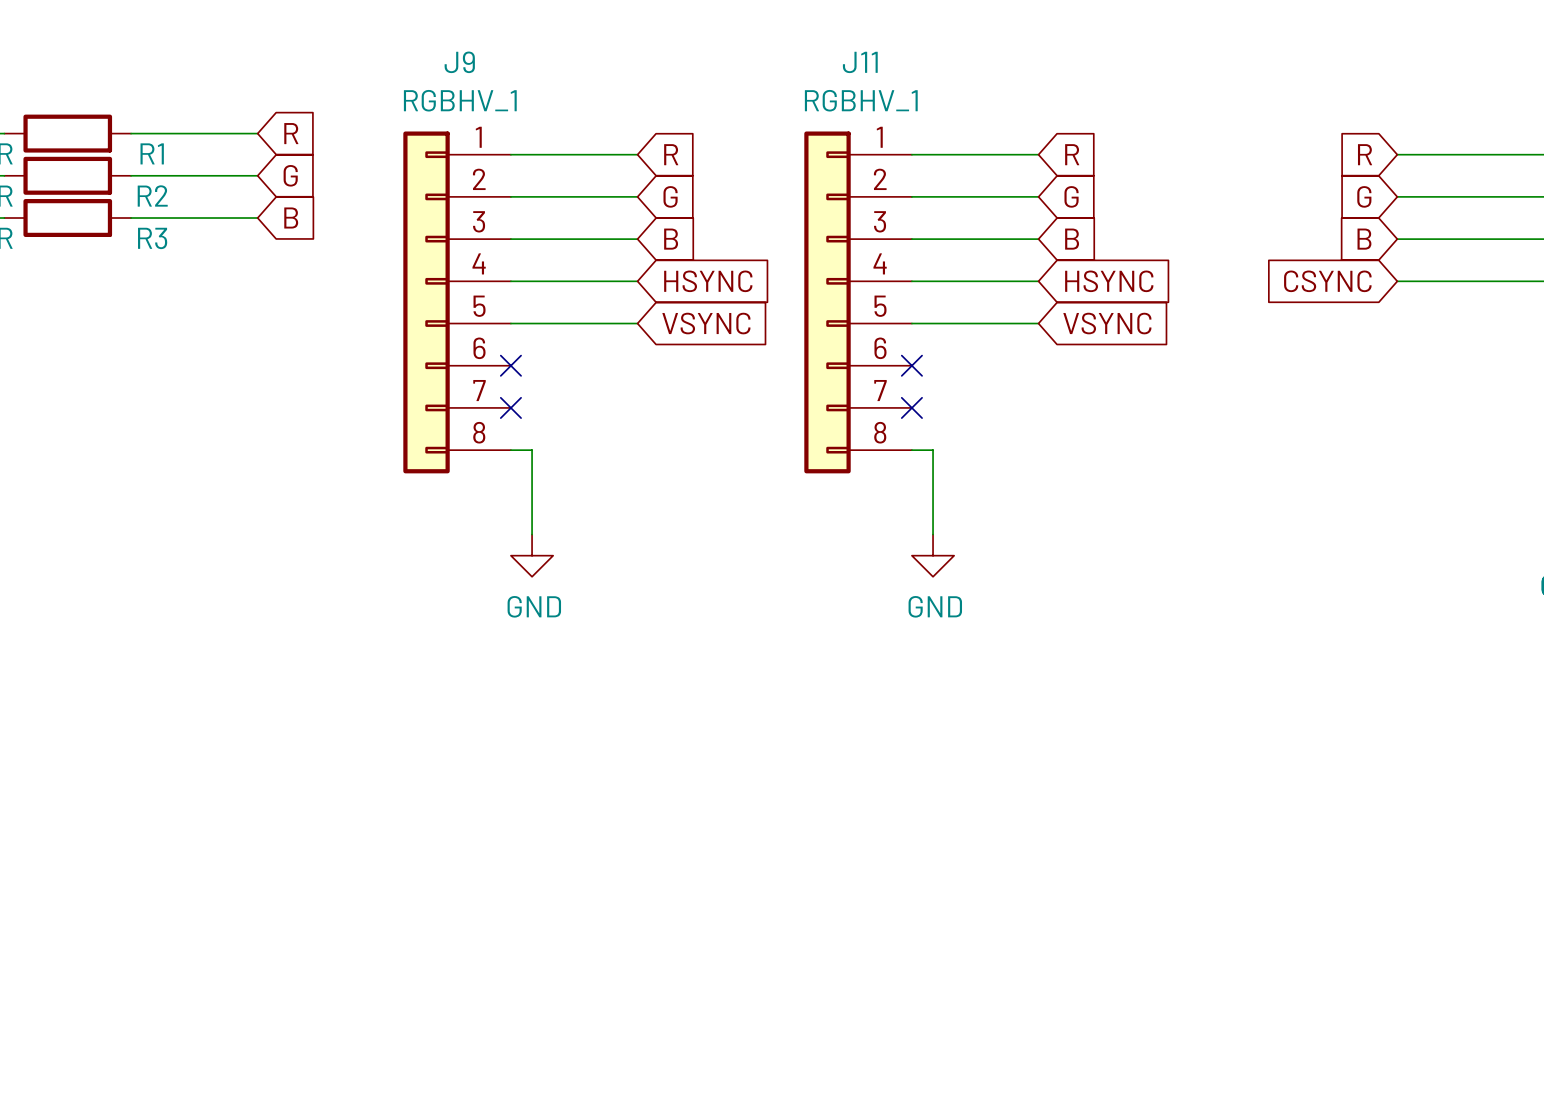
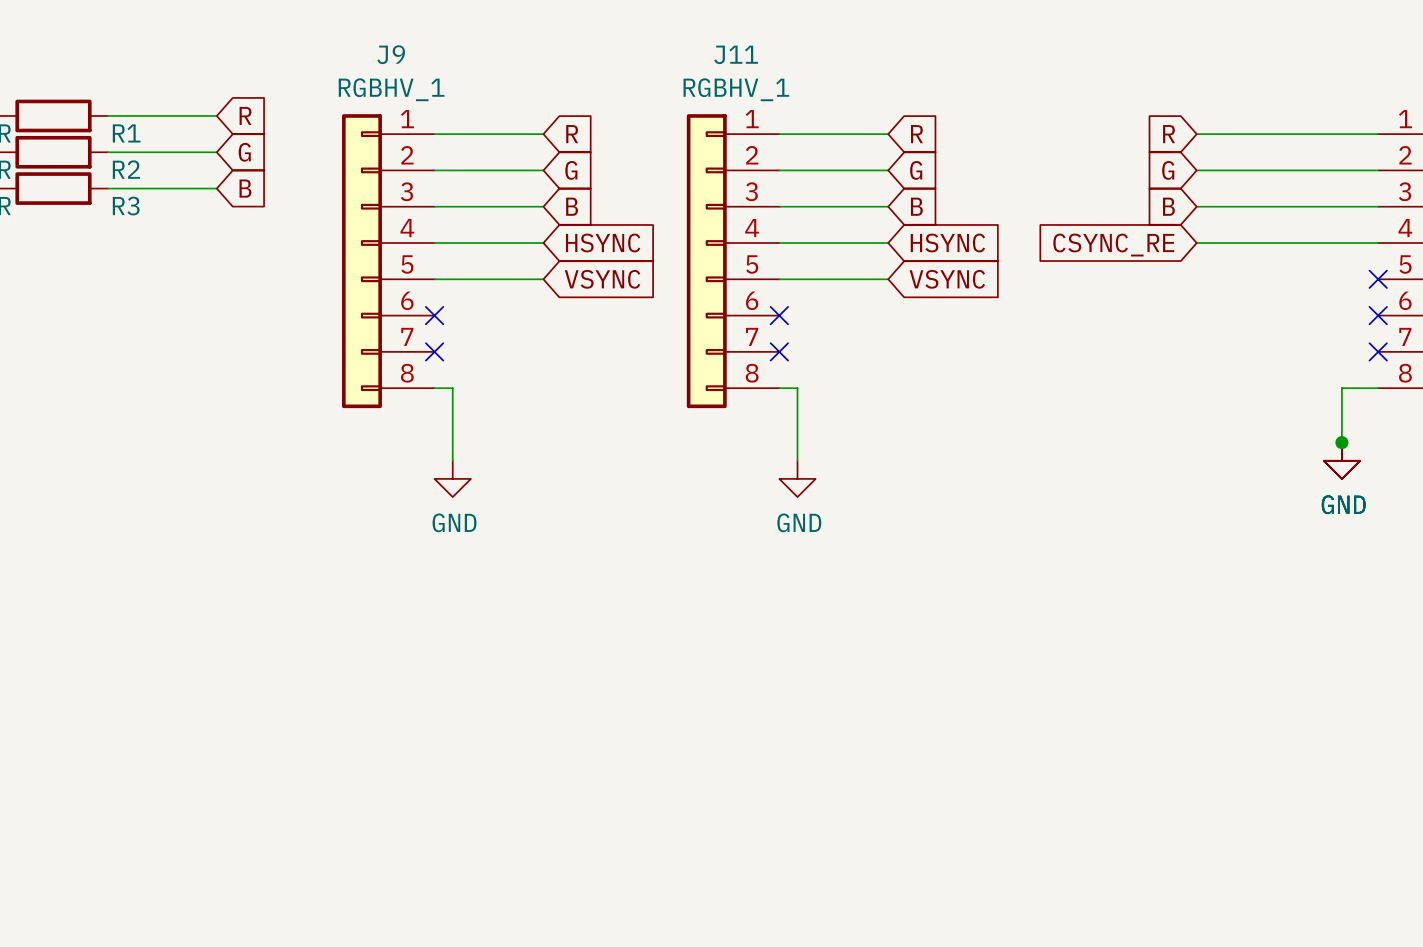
global label: CSYNC (1327, 281) -> CSYNC_RE (1113, 245)

